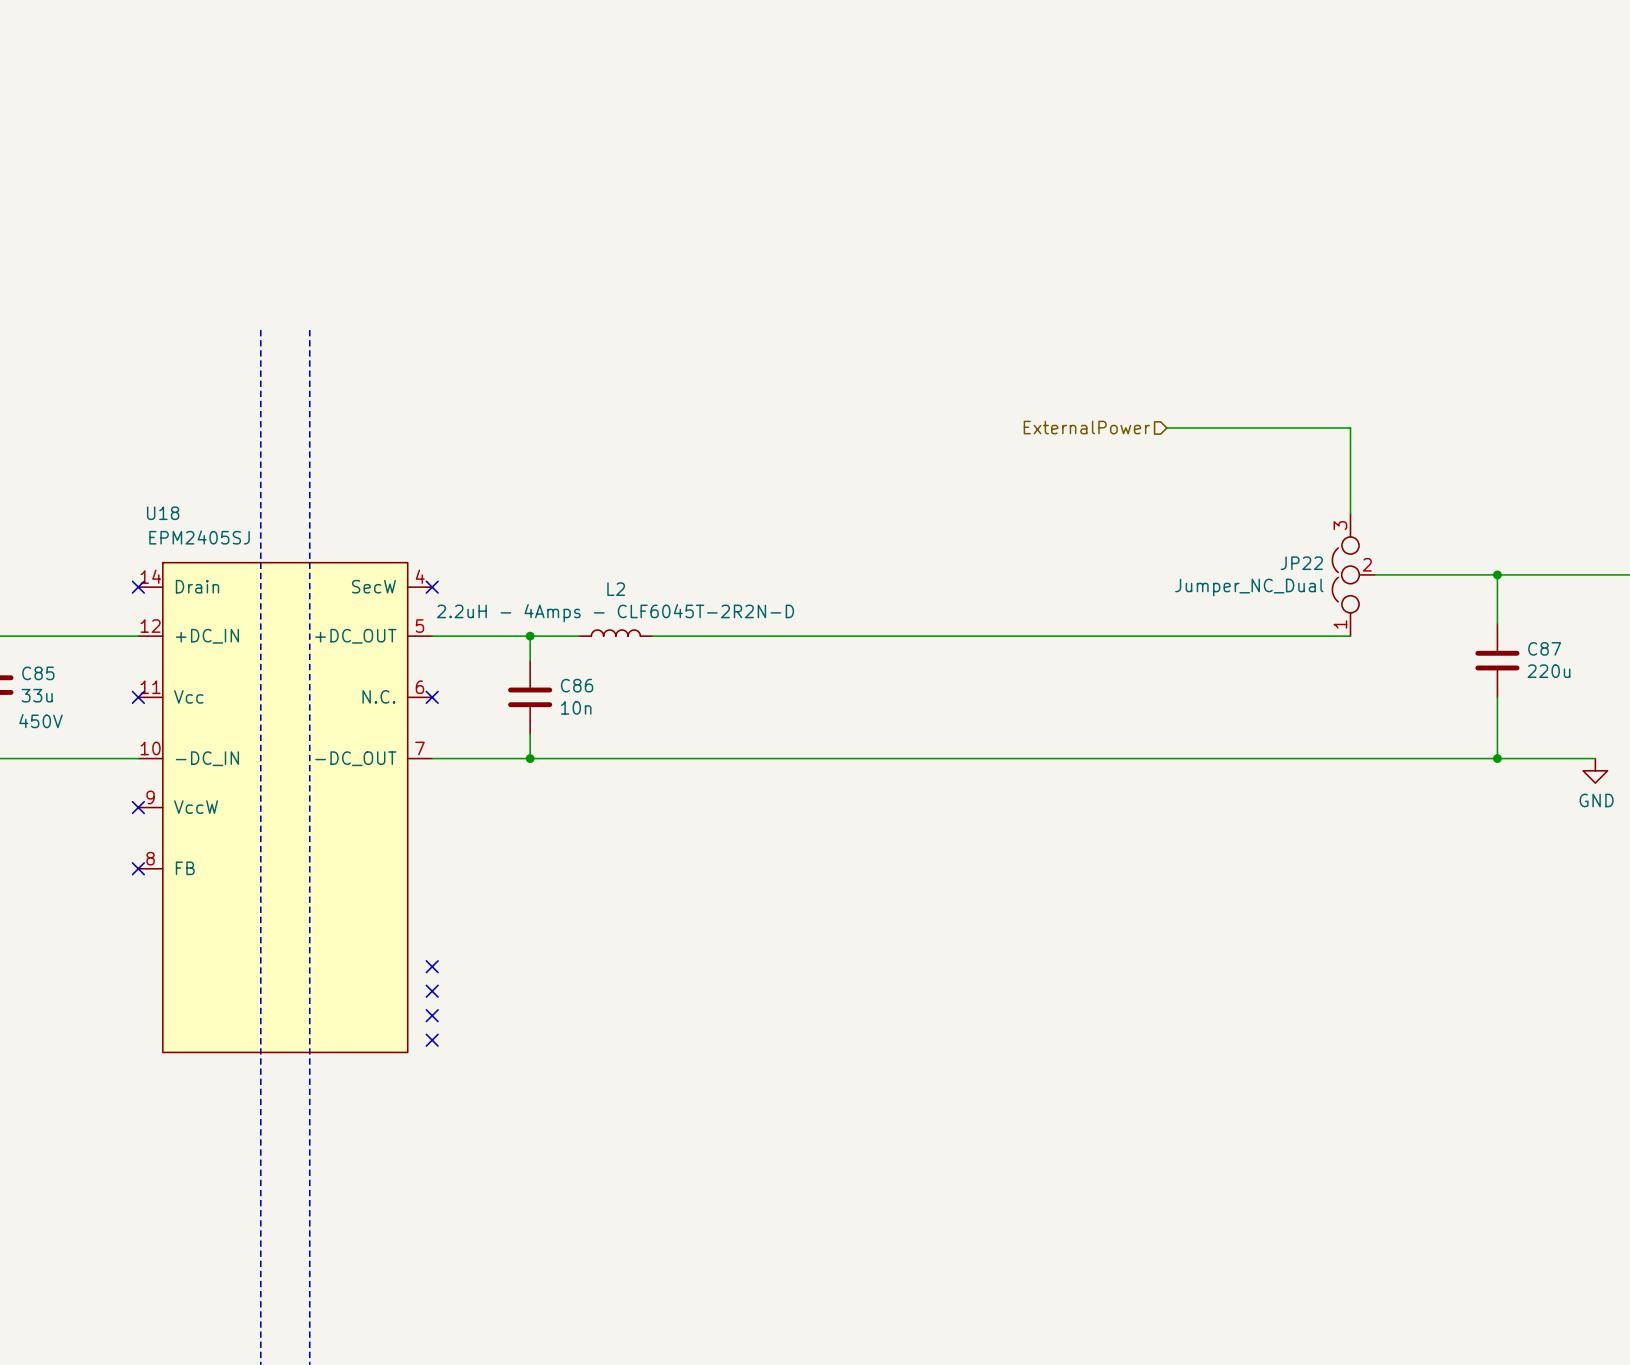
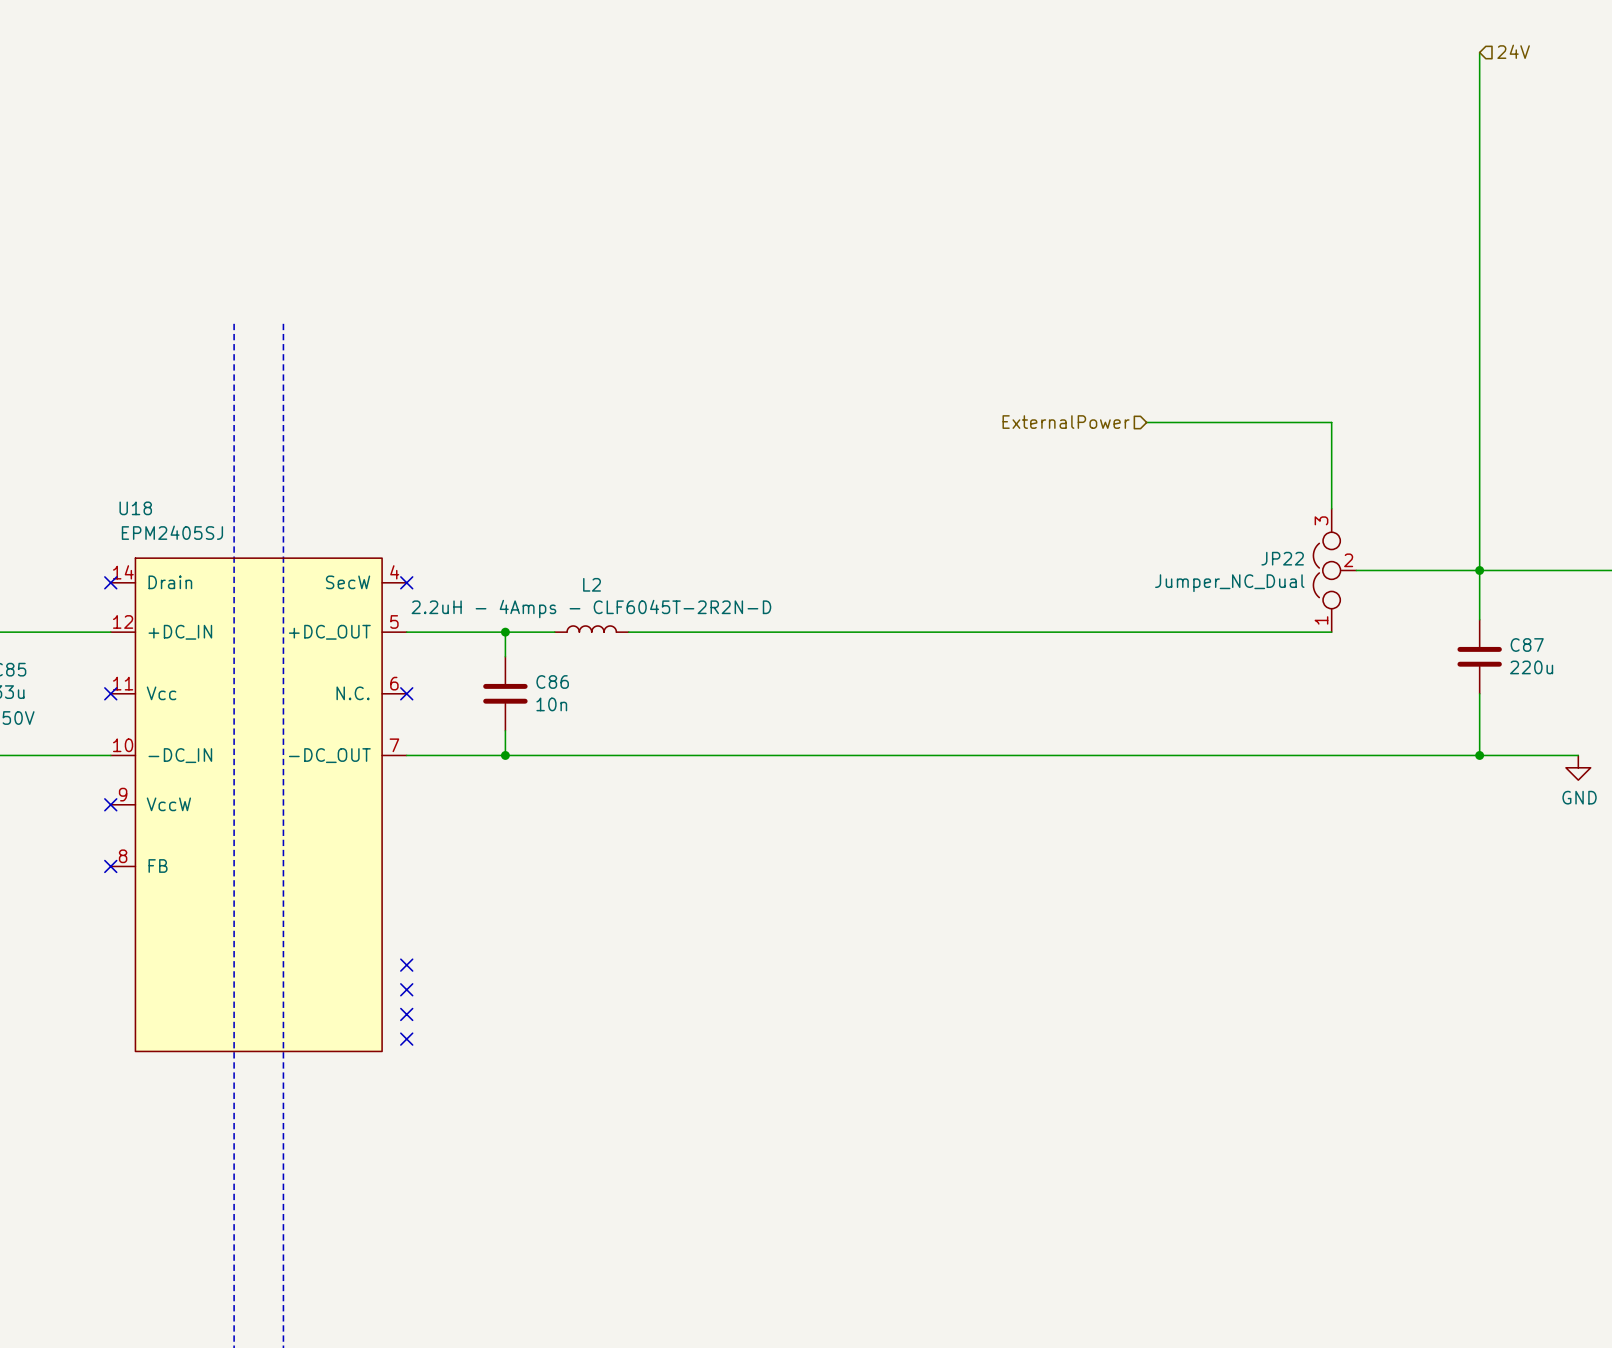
hierarchical label: none -> 24V (1513, 51)
wire: none -> (1479, 52) (1479, 570)

